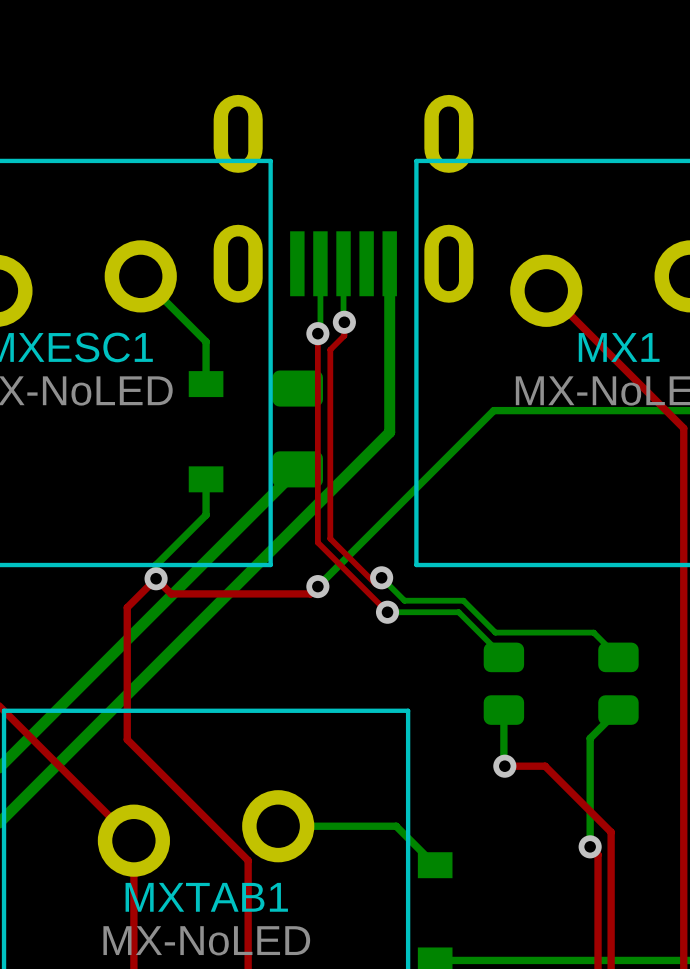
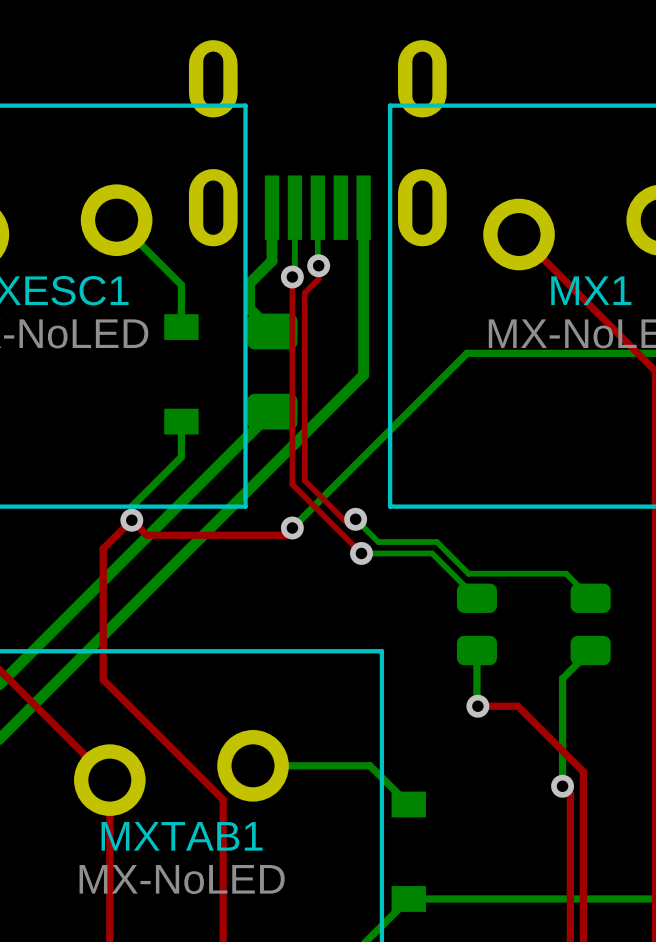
bottom track: none -> (272, 207) (272, 261) (249, 283) (249, 308) (272, 331)

